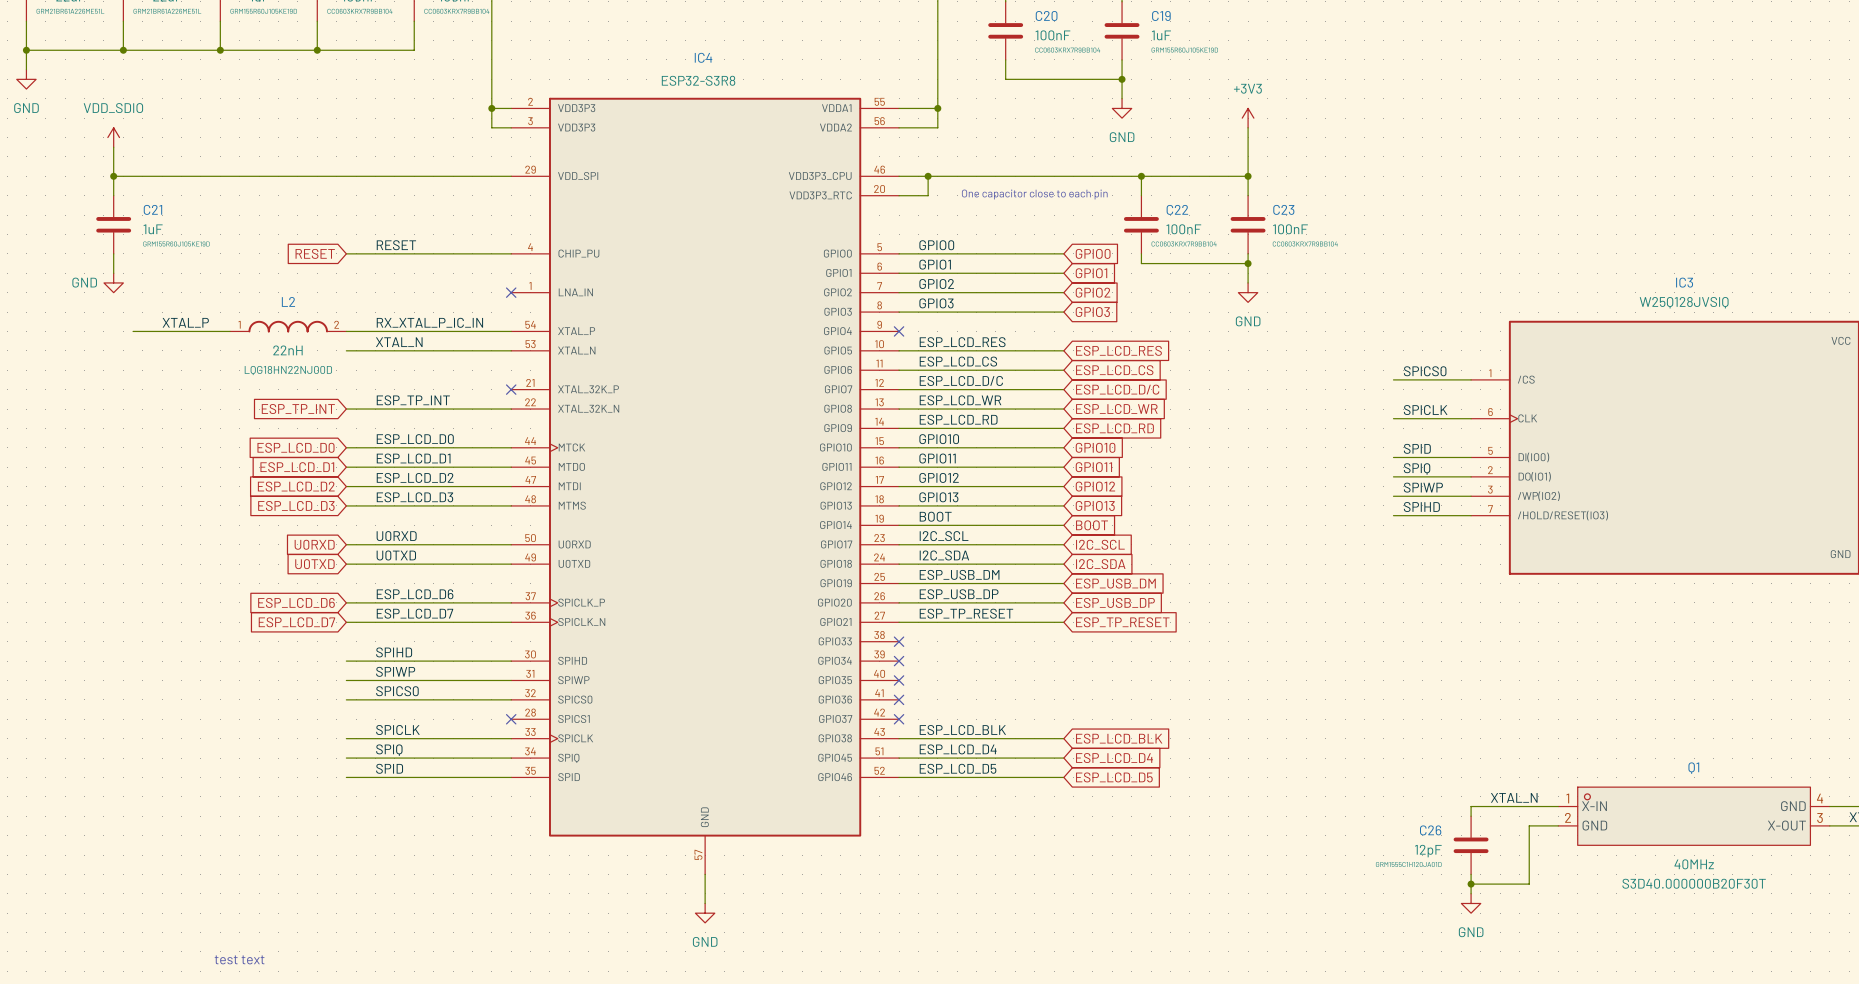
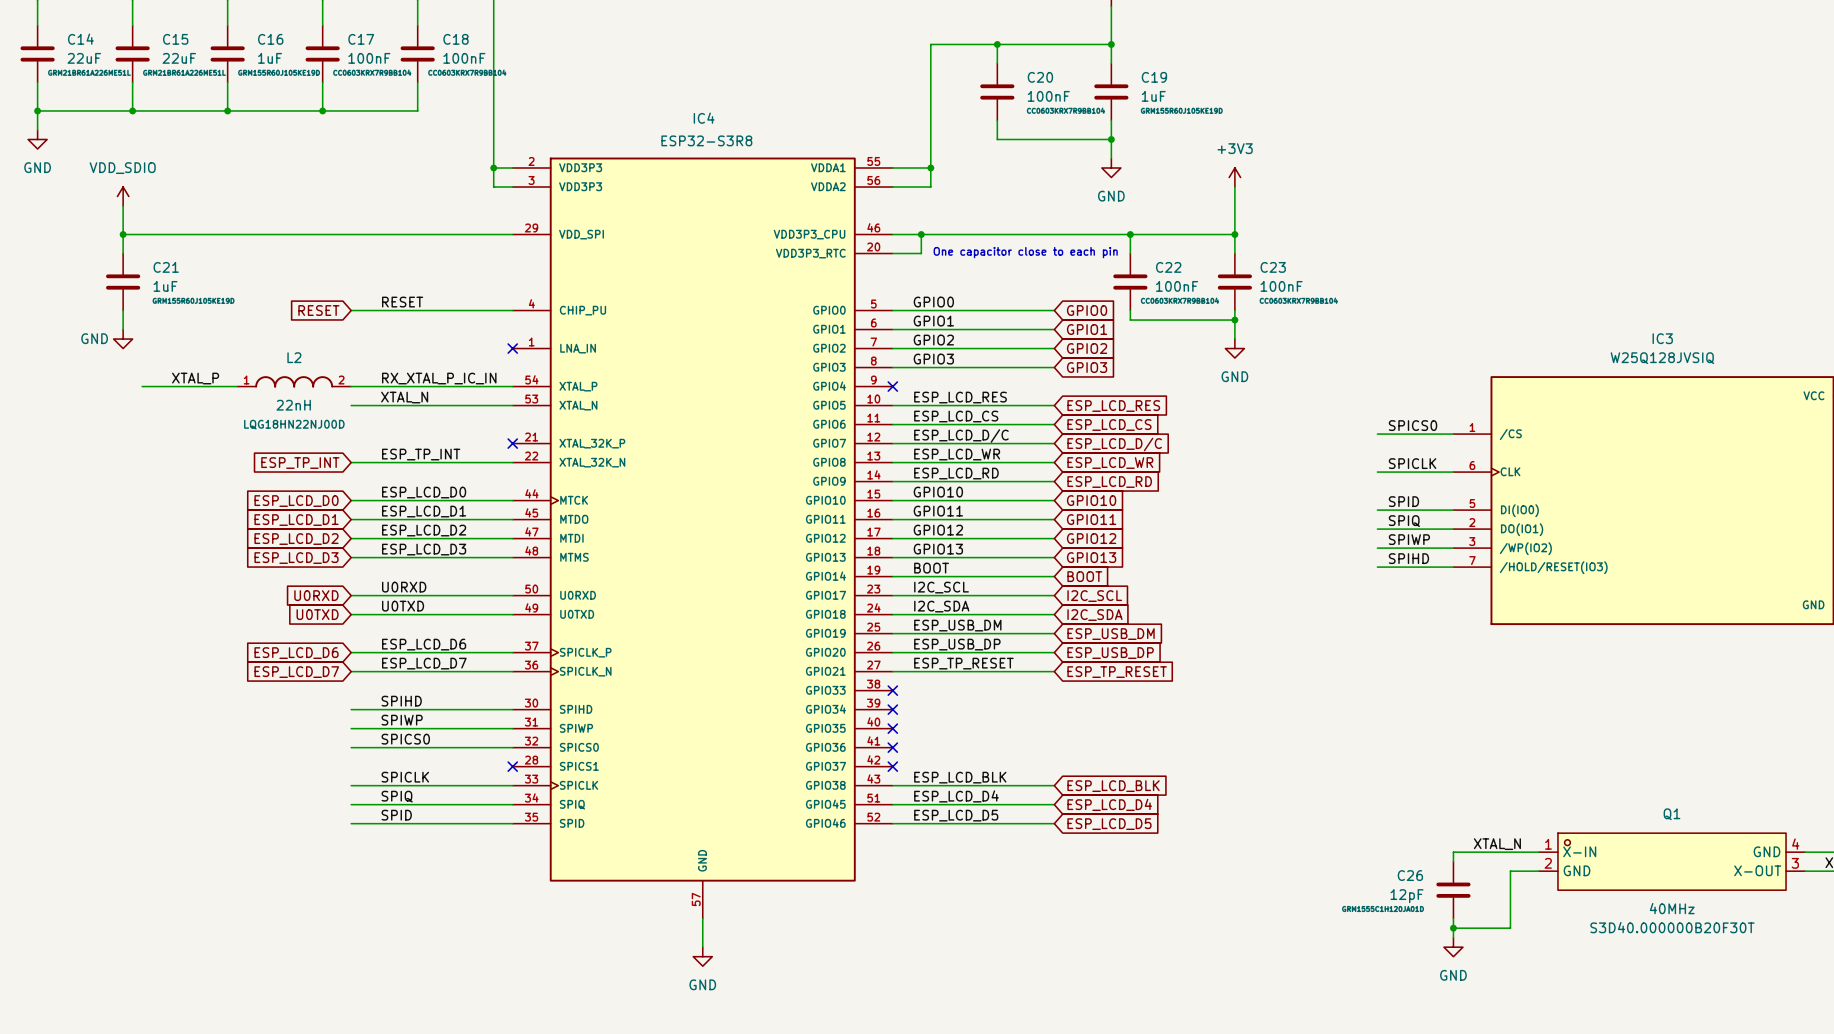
text: test text (239, 959) -> none

